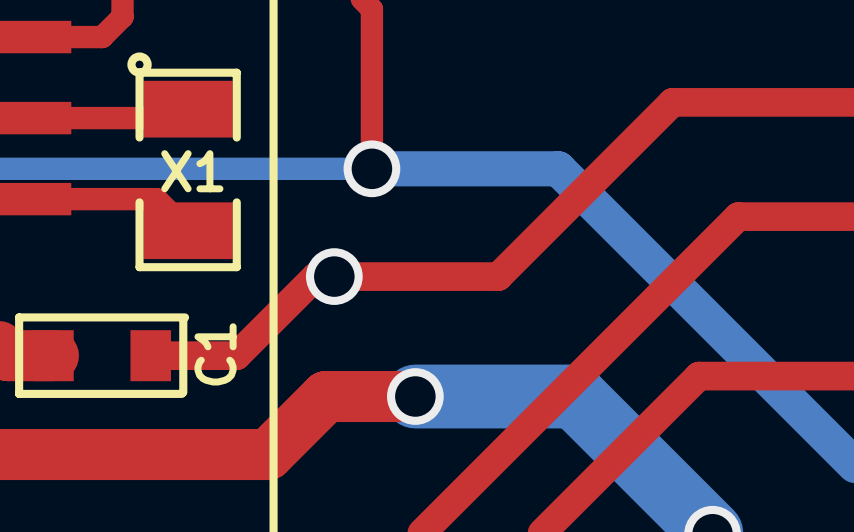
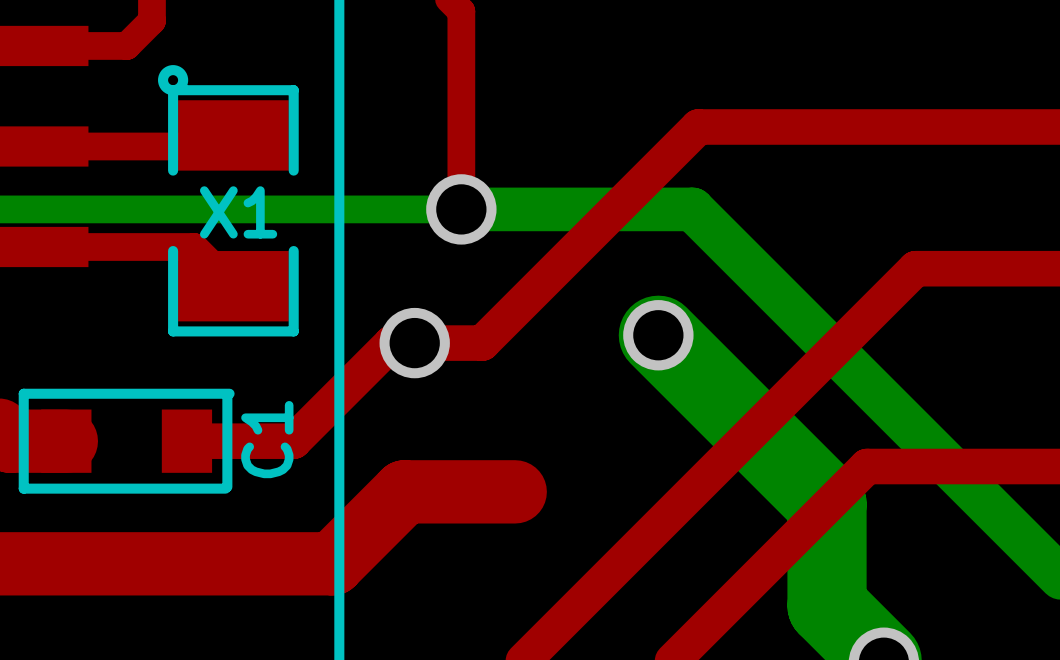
top track: (672, 102) (498, 276) (388, 276) -> (834, 126) (698, 126) (482, 343)
via: none -> (658, 335)
bottom track: (415, 396) (574, 396) (666, 488) -> (658, 335) (827, 503) (827, 605)
via: (415, 396) -> none

